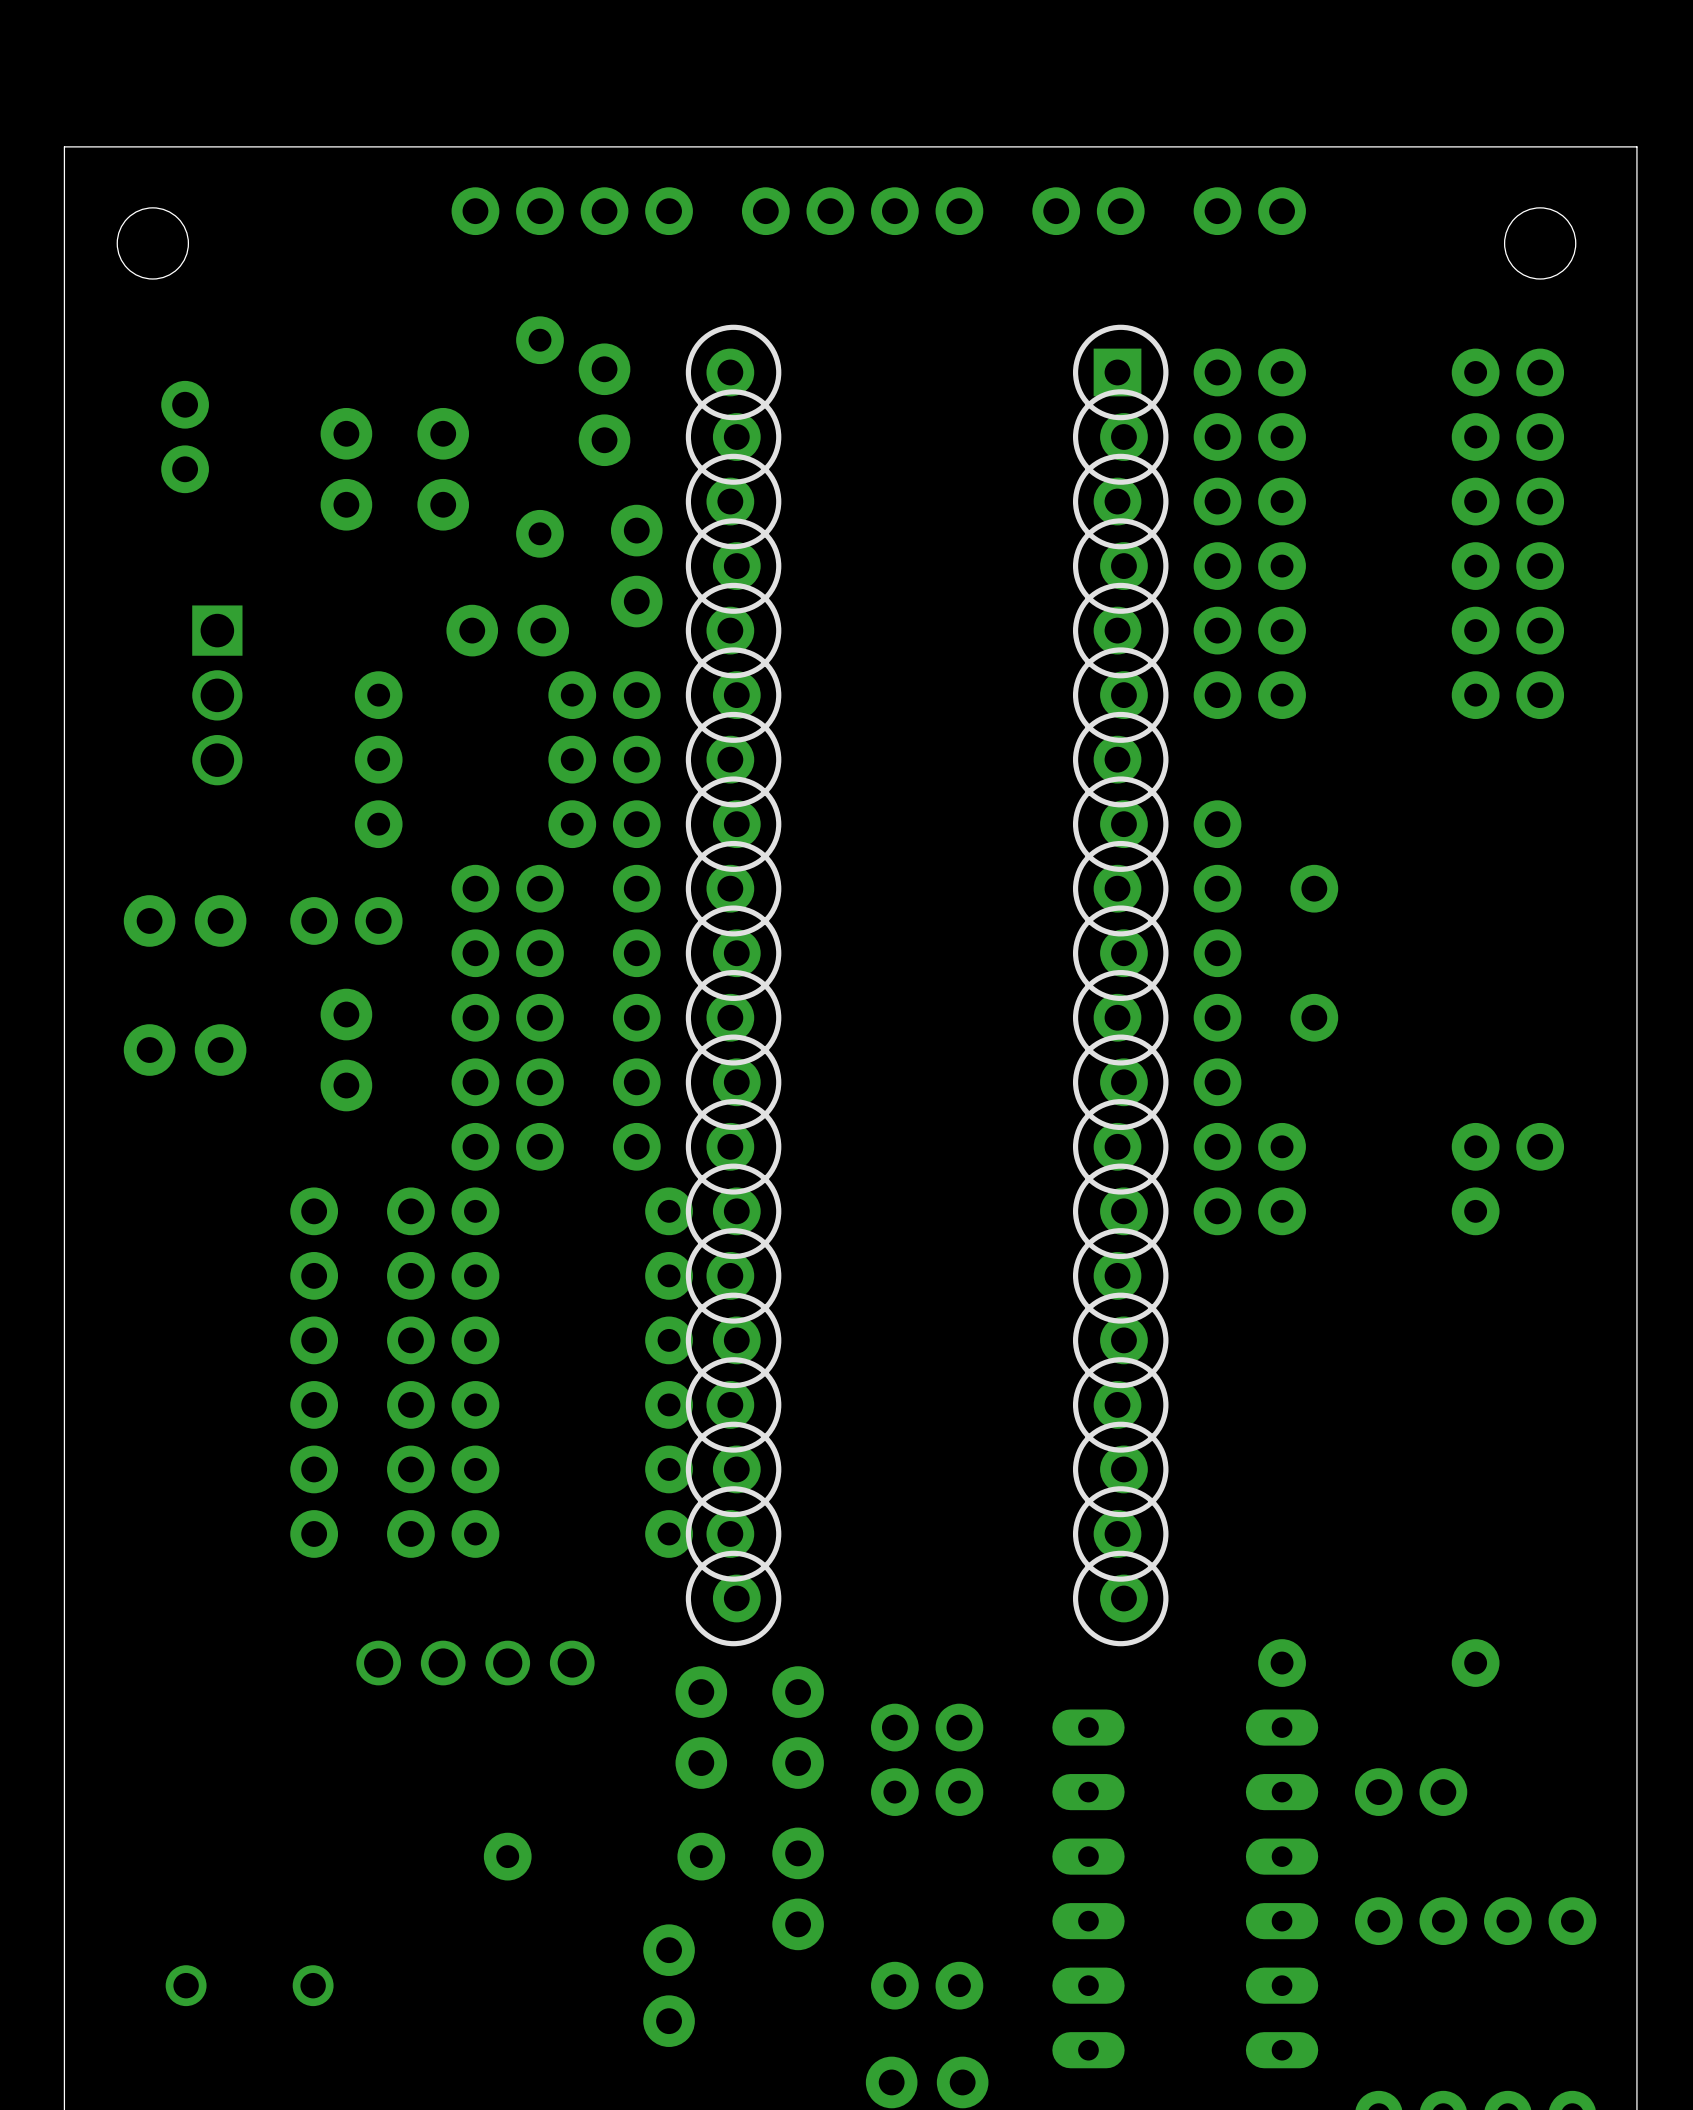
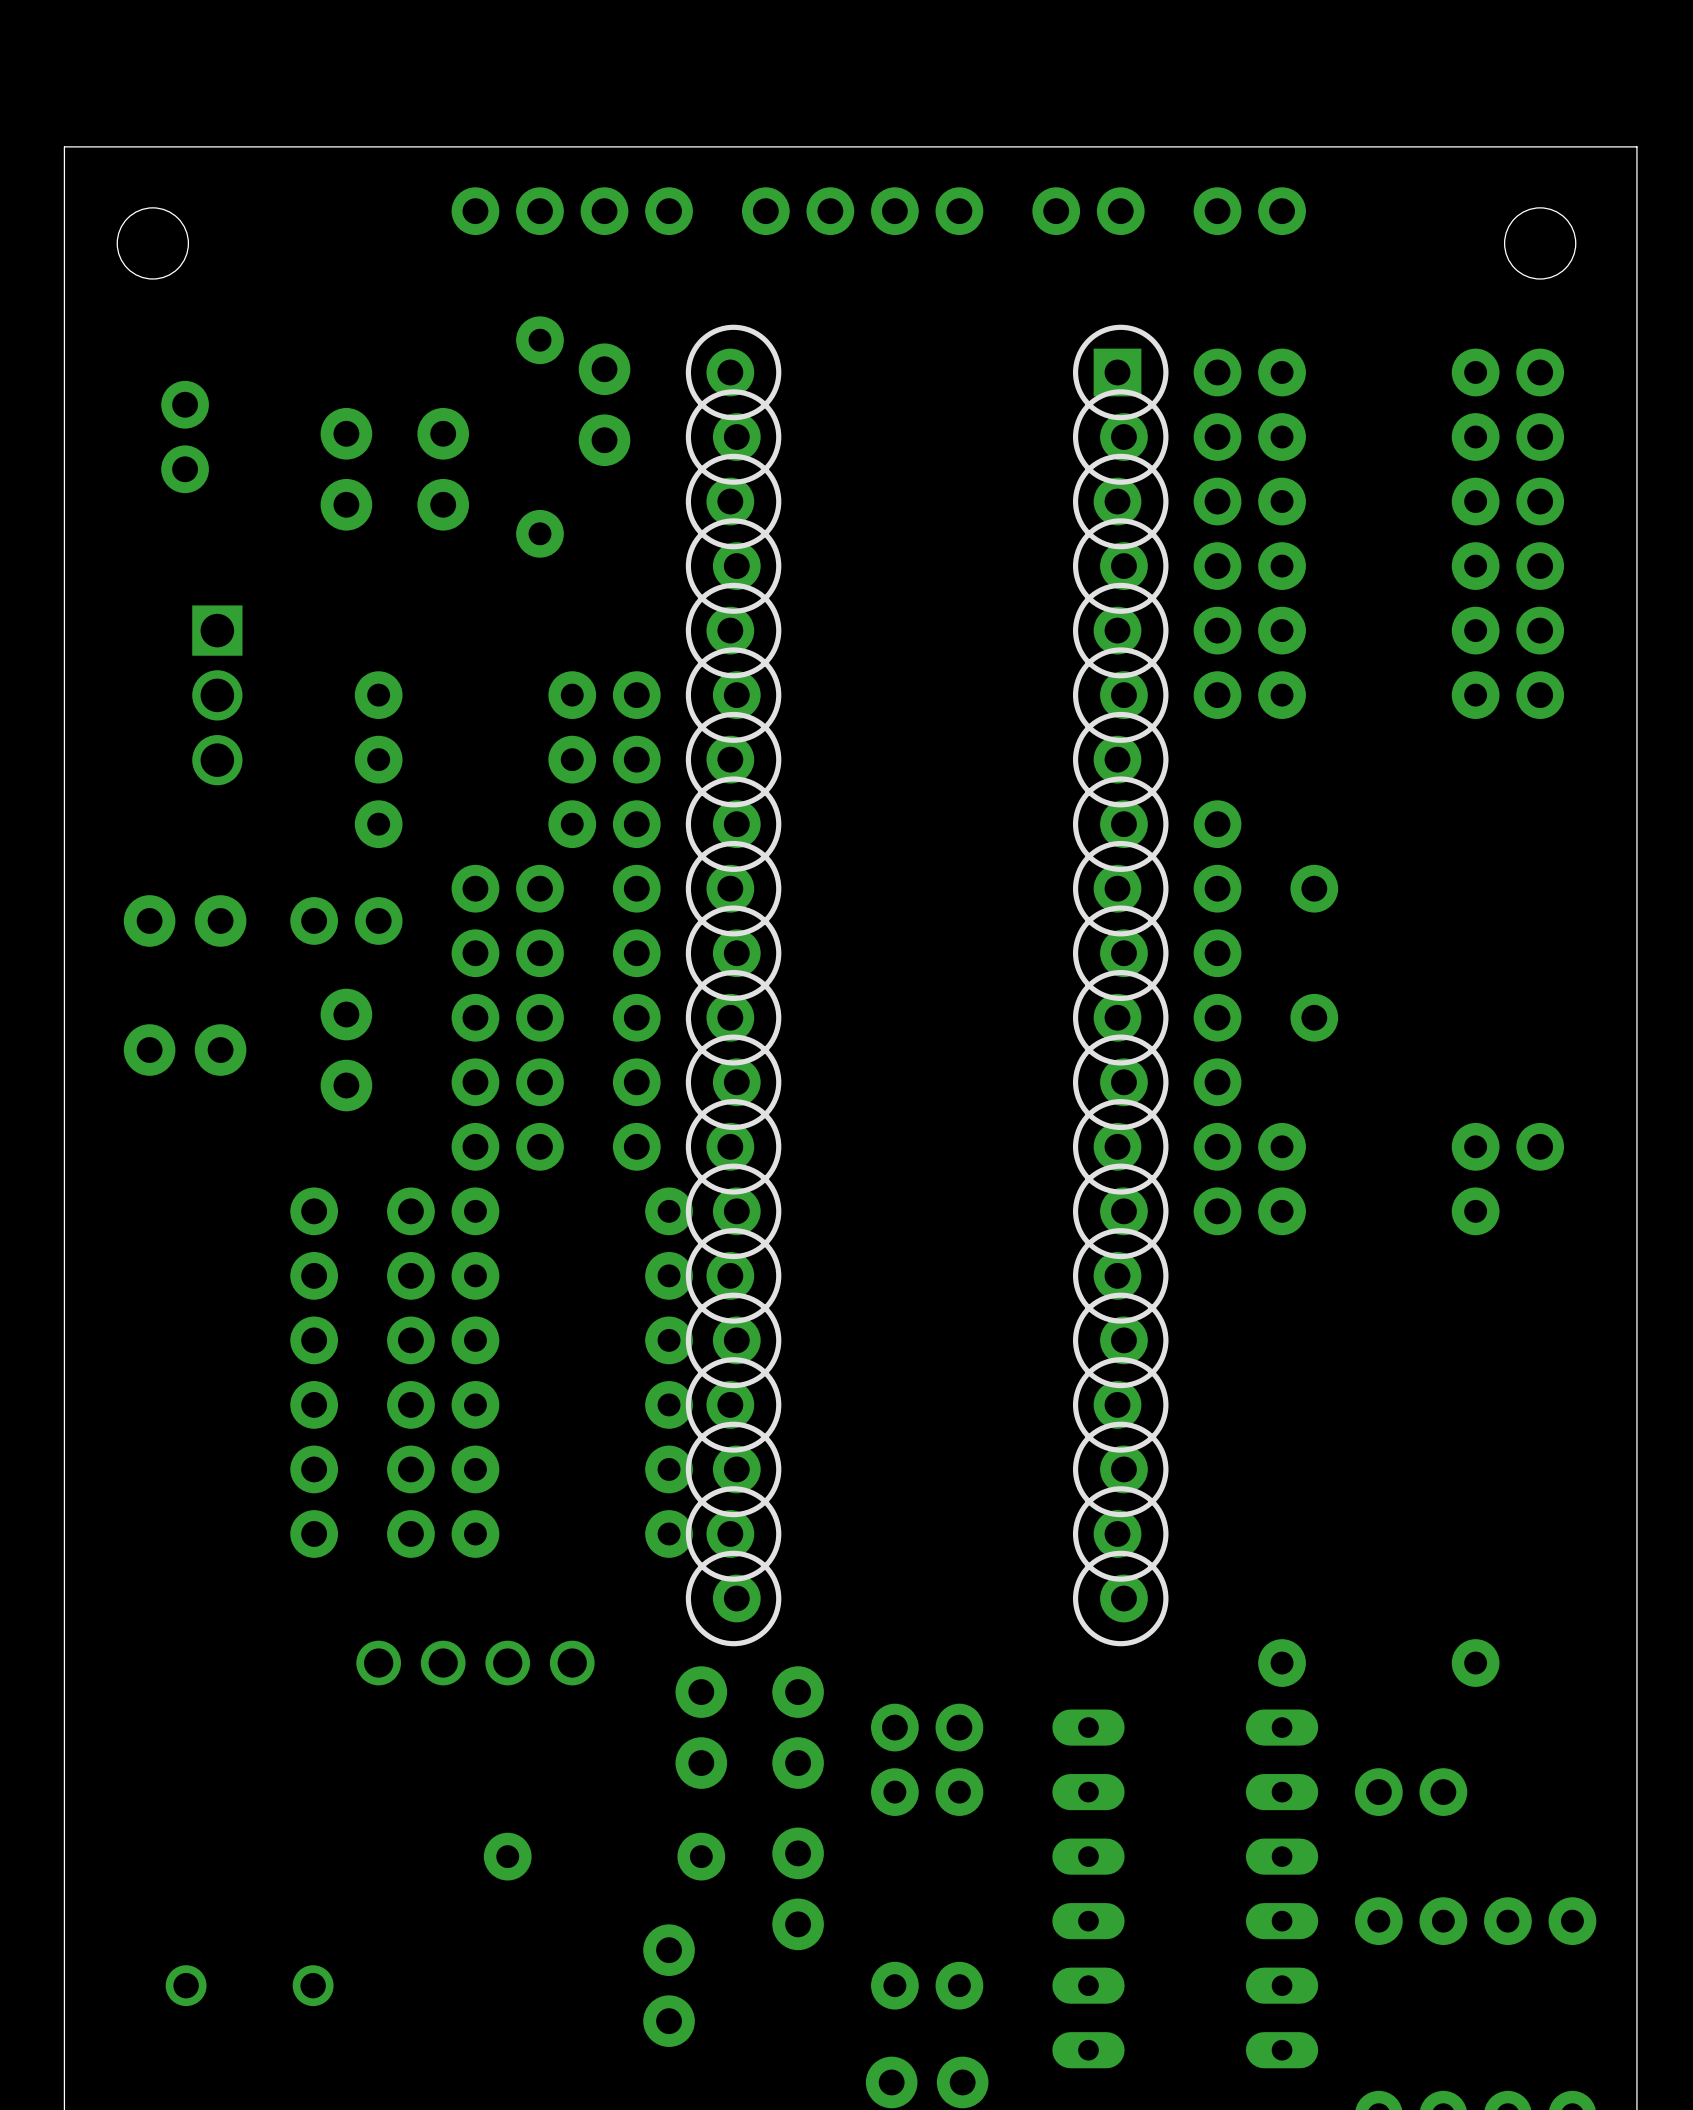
part: (636, 566) -> none
part: (507, 630) -> none

